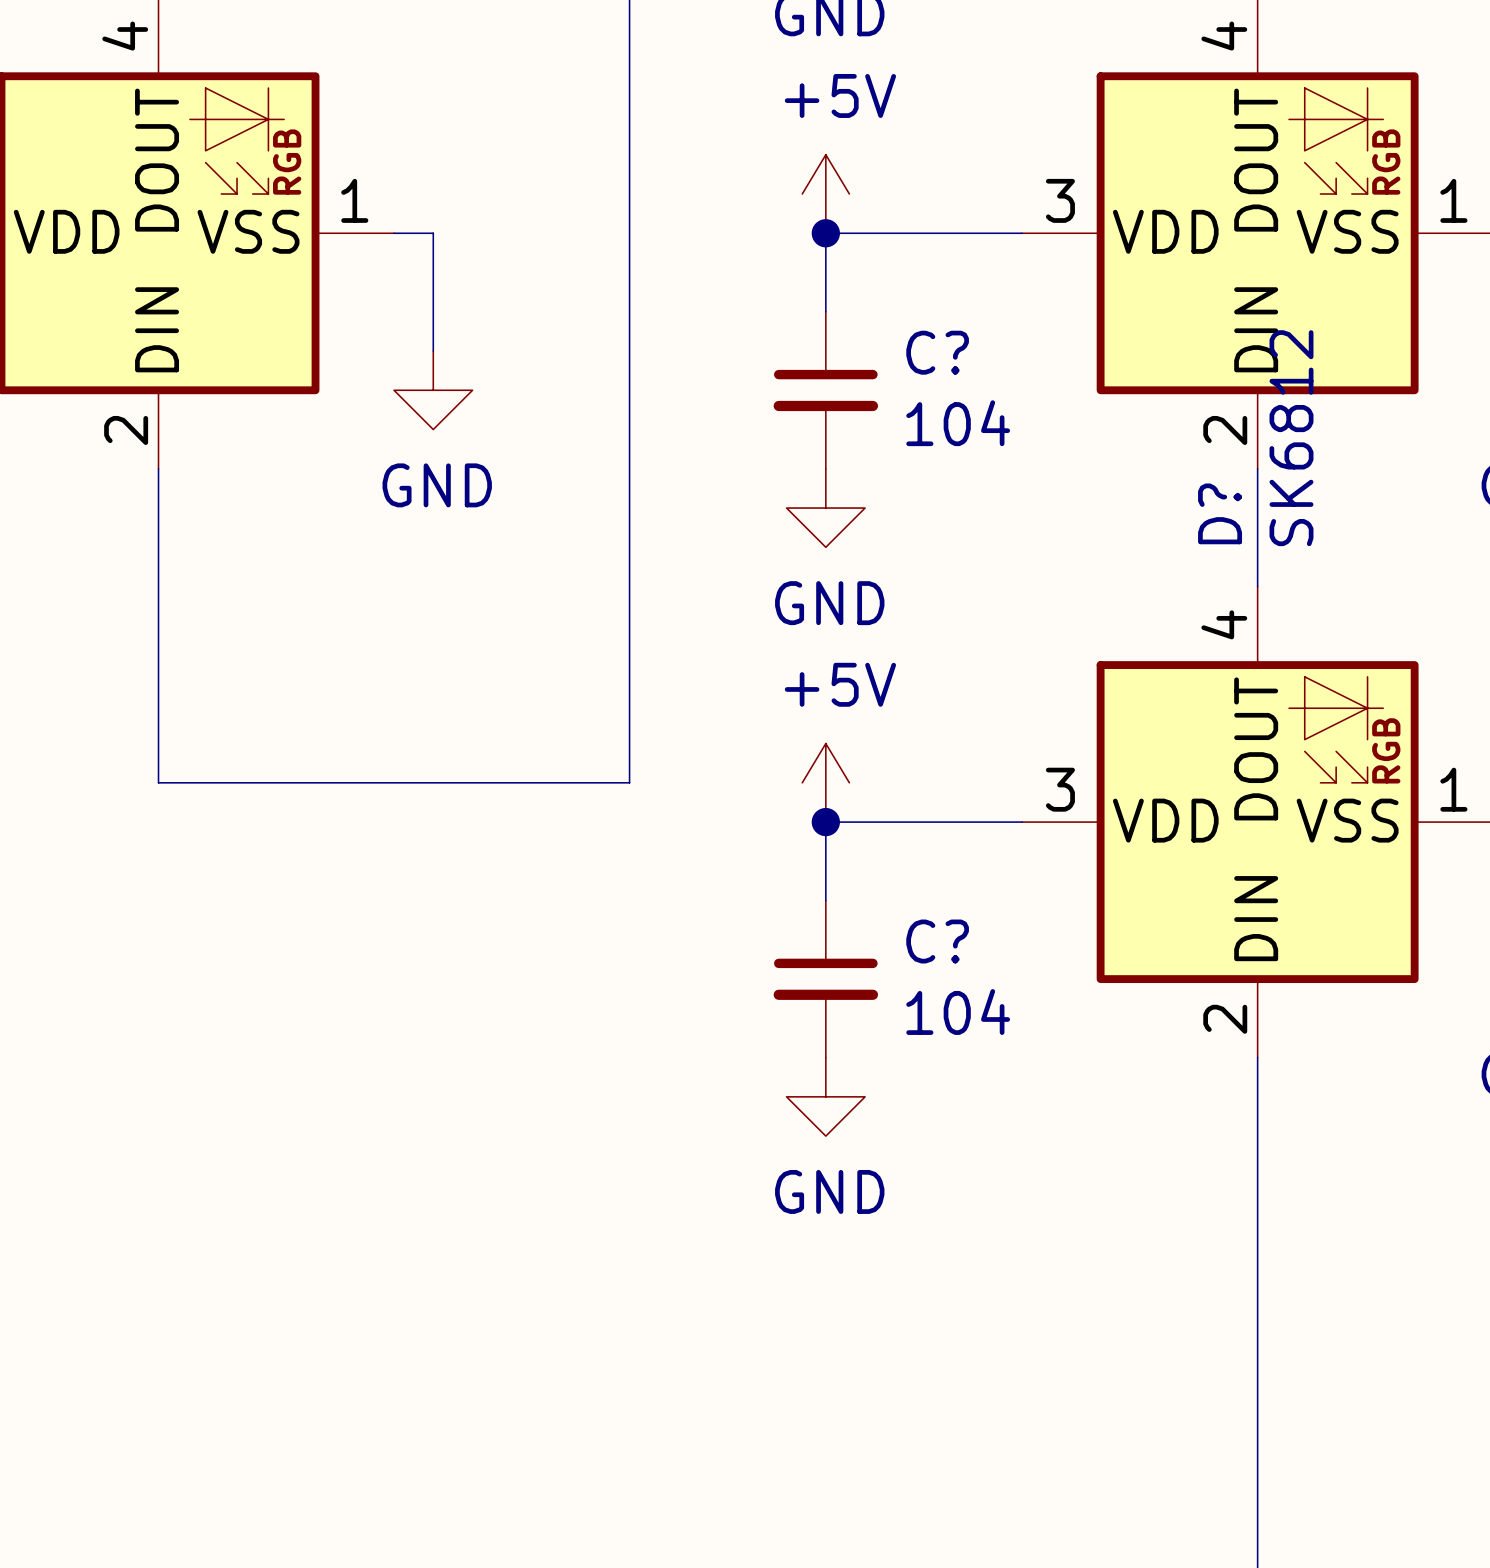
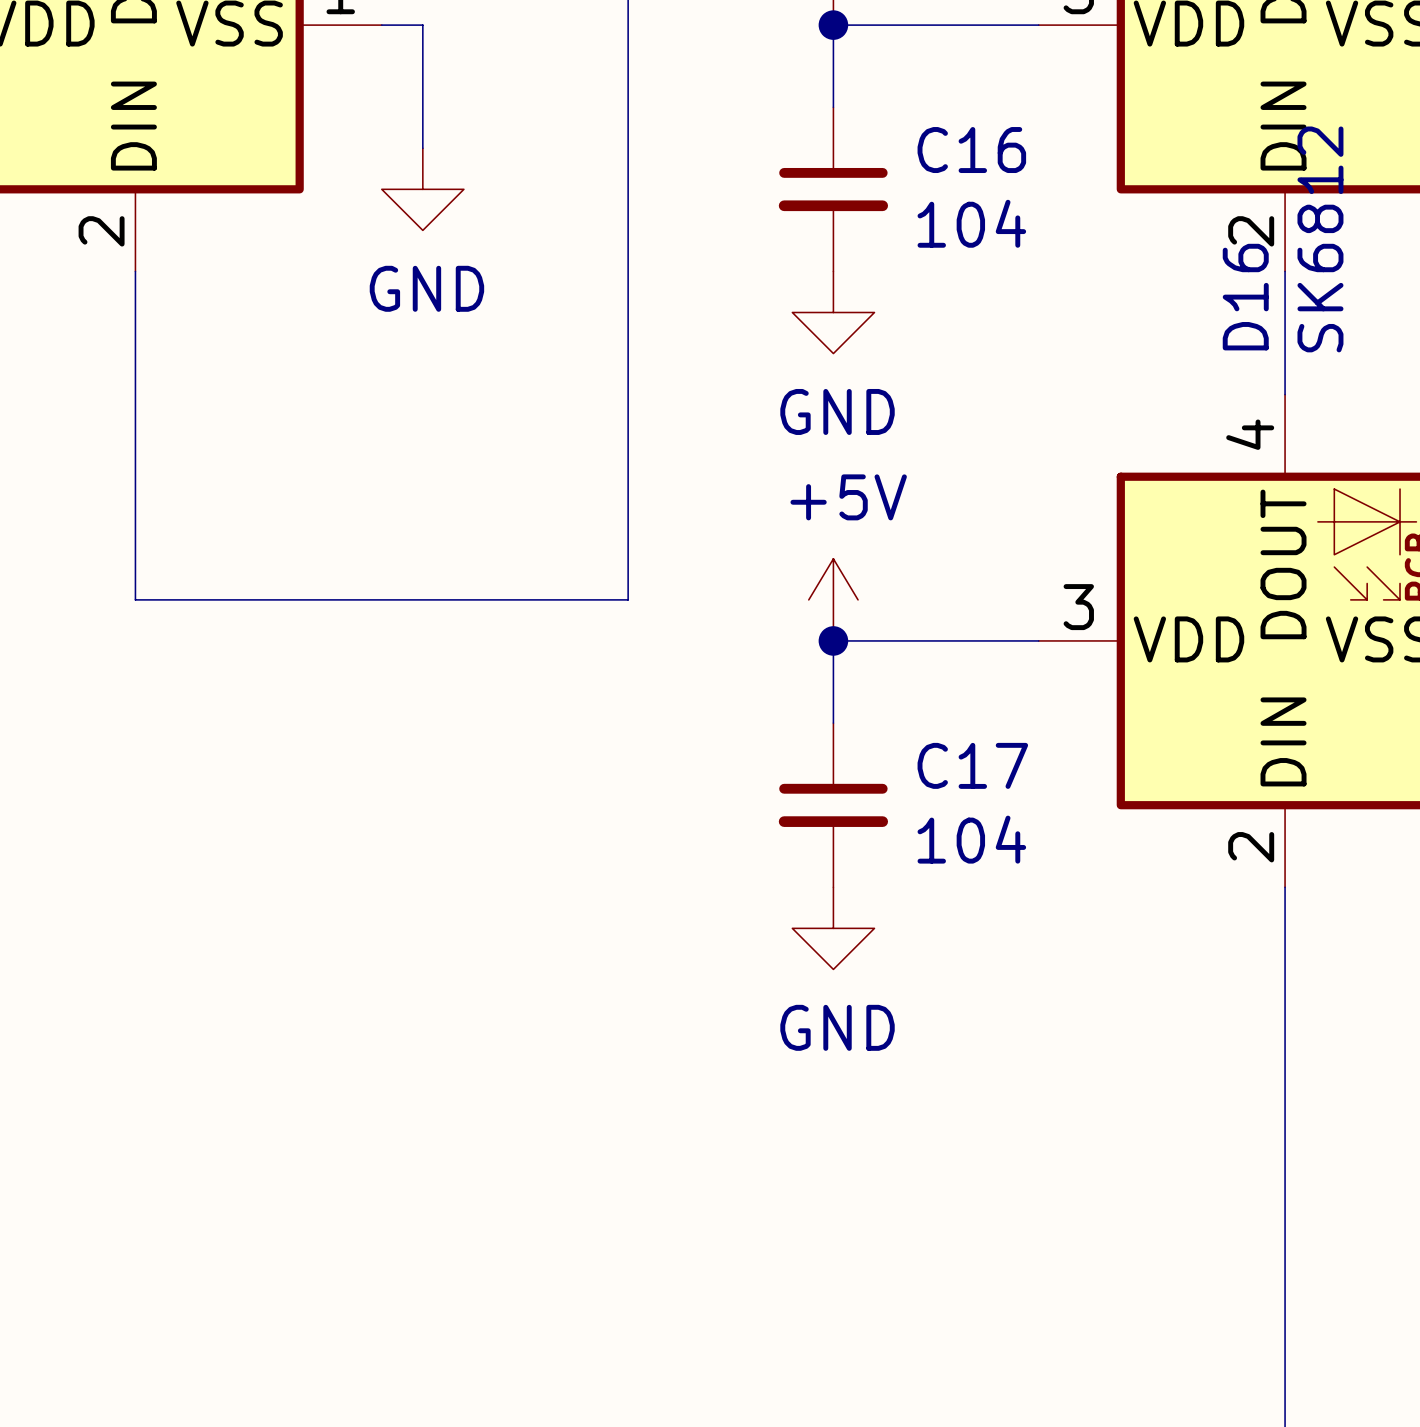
C? name: C? (937, 352) -> C16 (971, 150)
D? name: D? (1220, 513) -> D16 (1245, 297)
C? name: C? (937, 941) -> C17 (972, 765)

